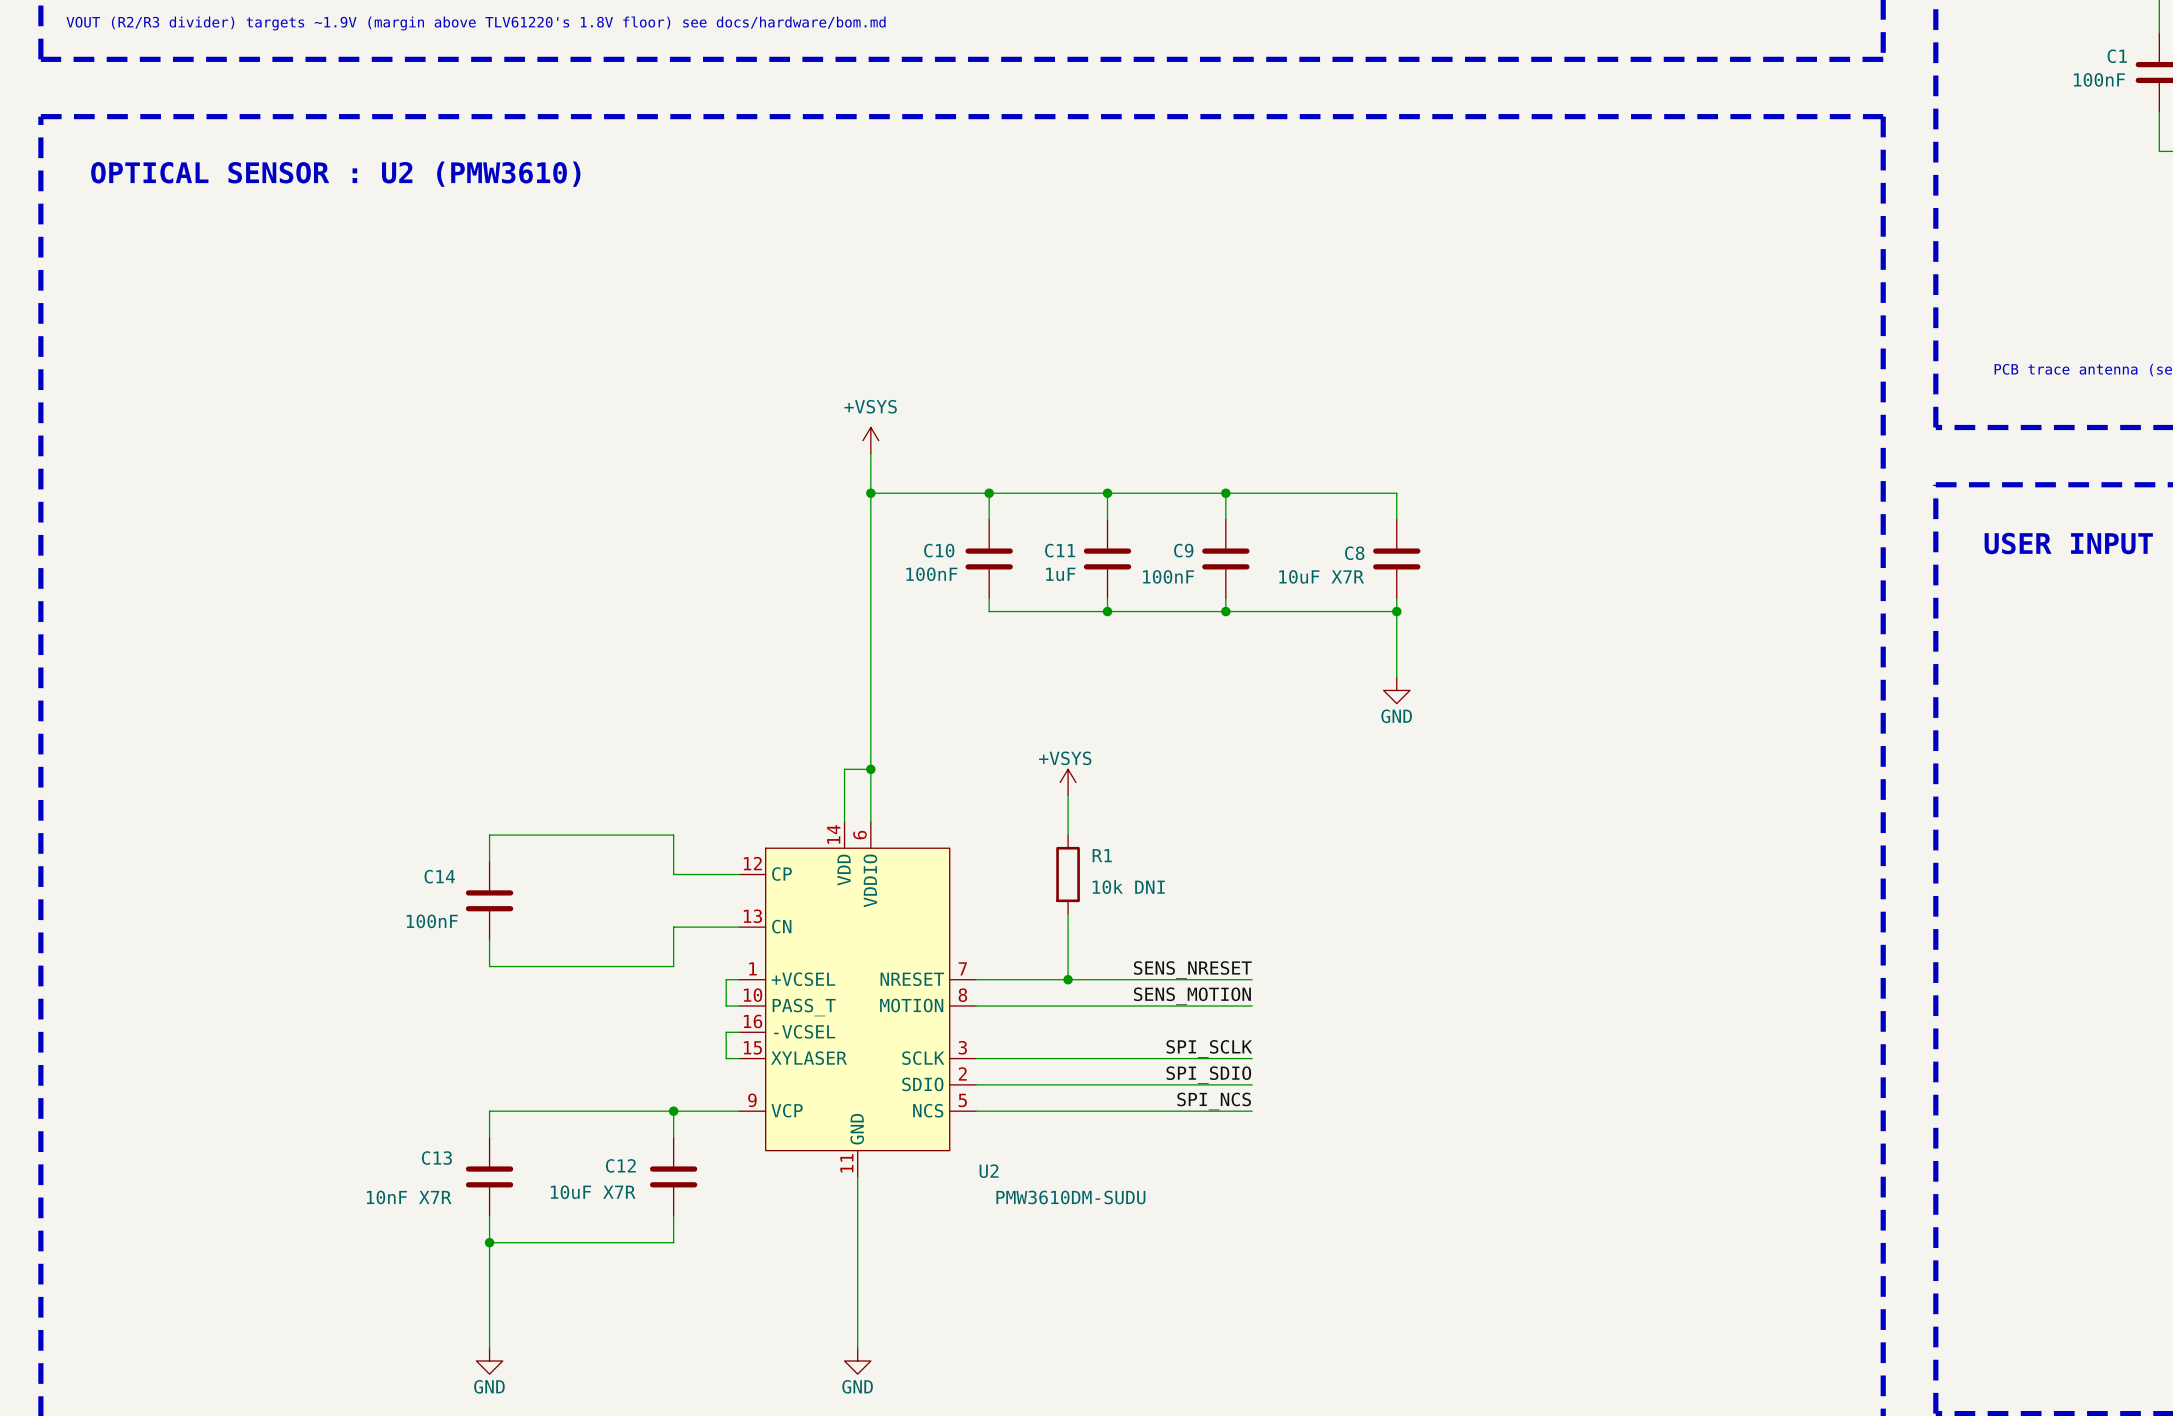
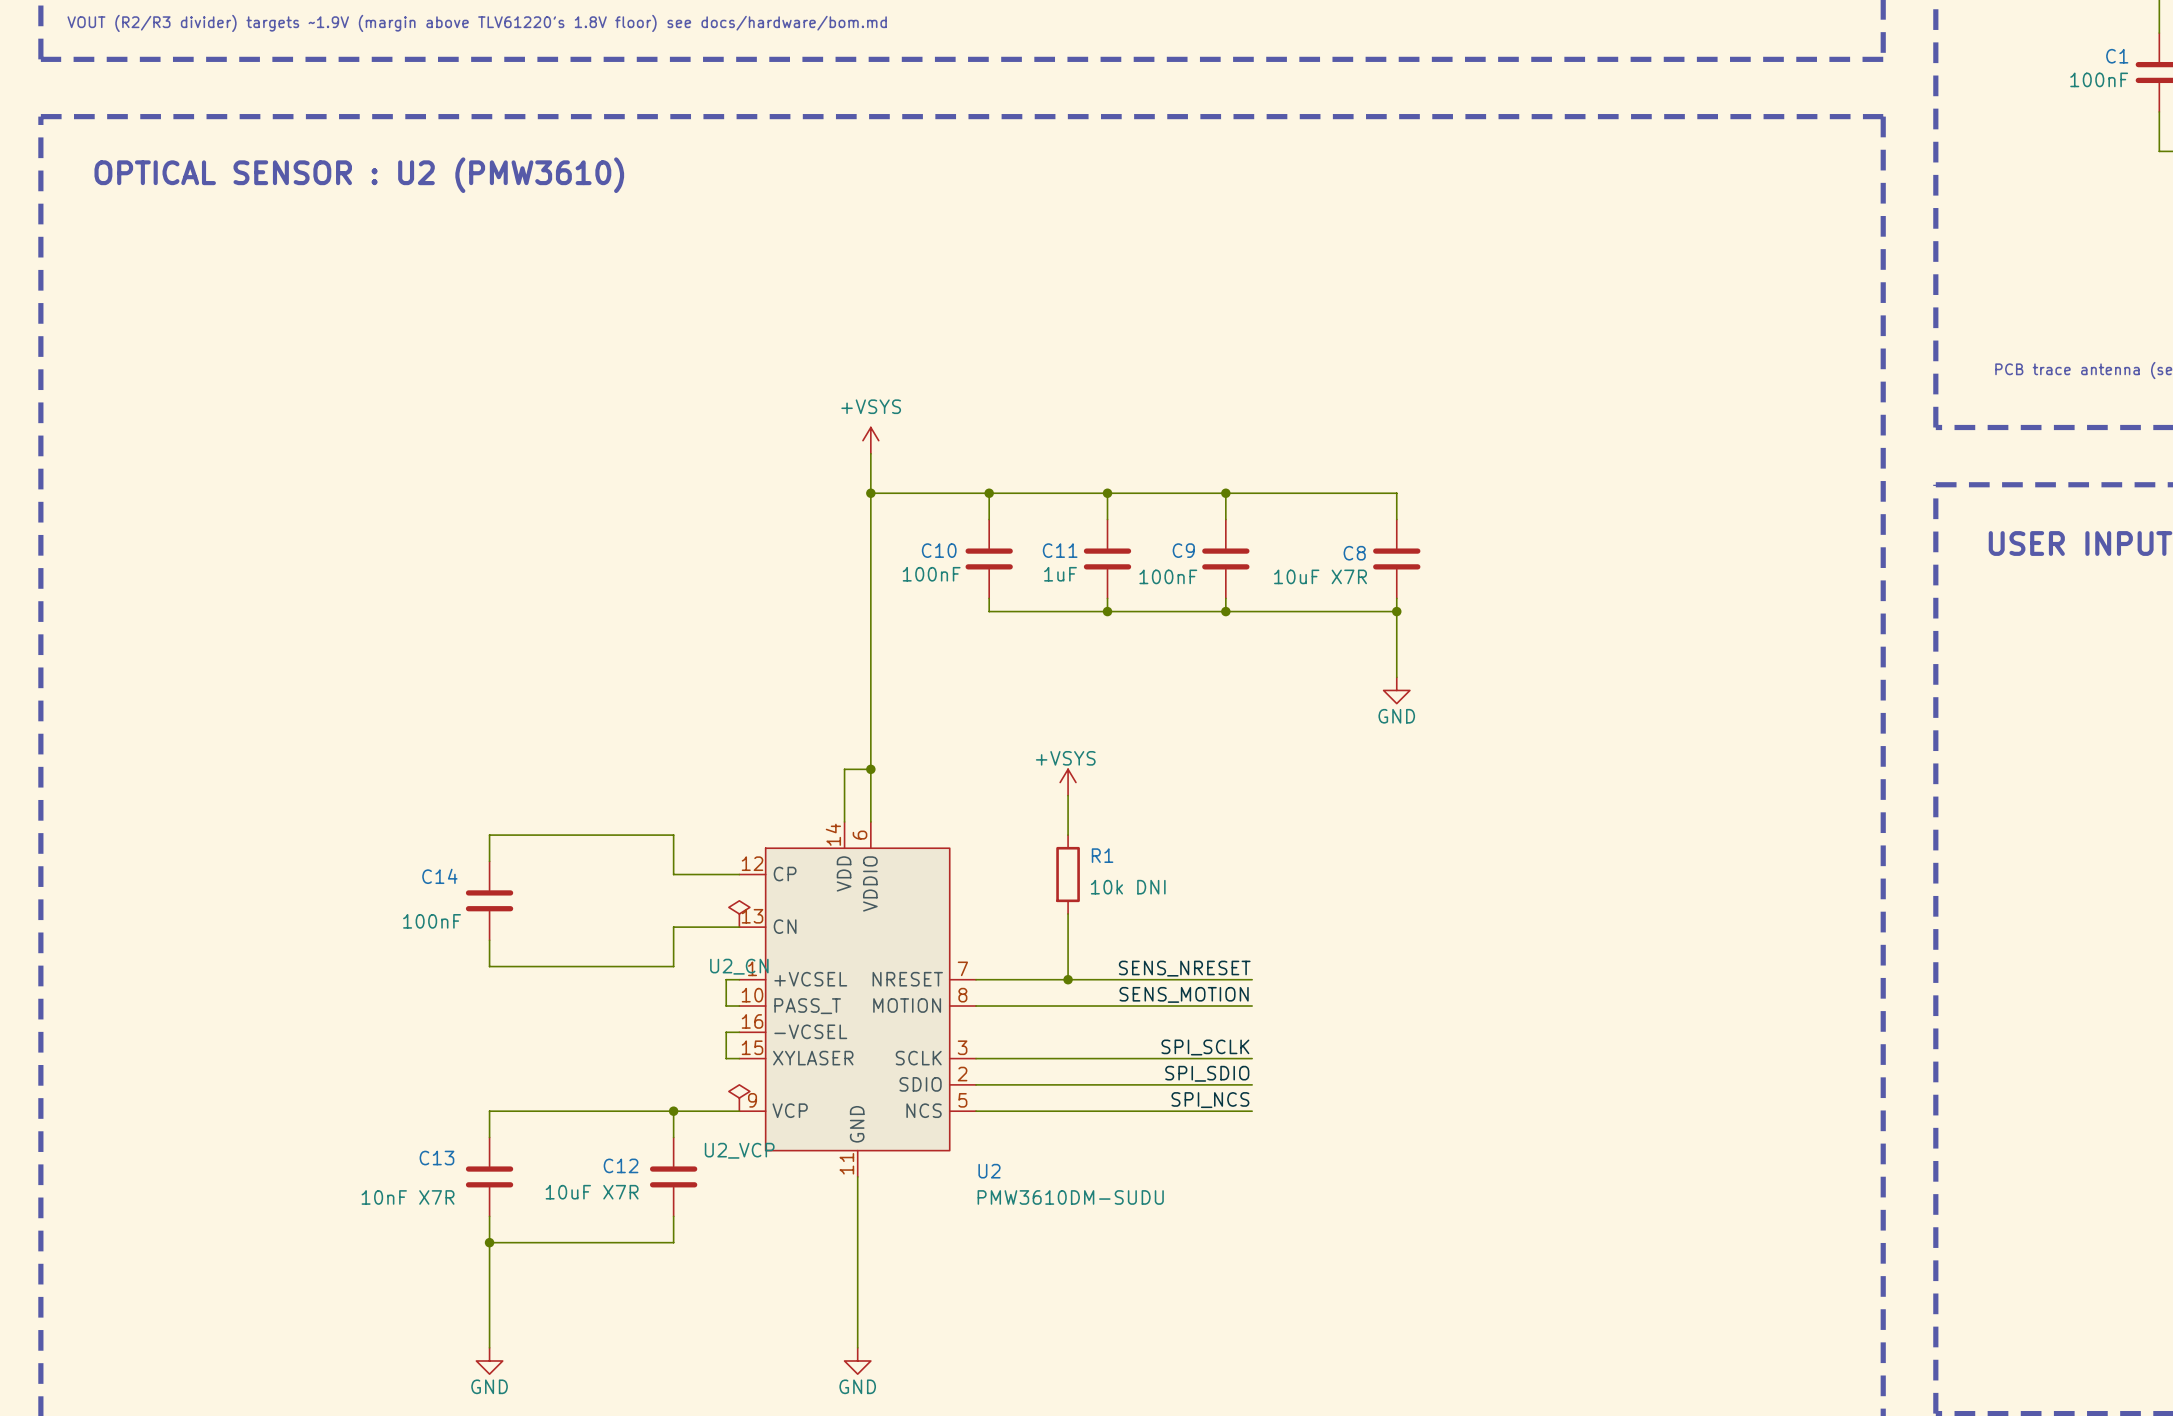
power symbol: none -> U2_CN (739, 913)
power symbol: none -> U2_VCP (739, 1098)

